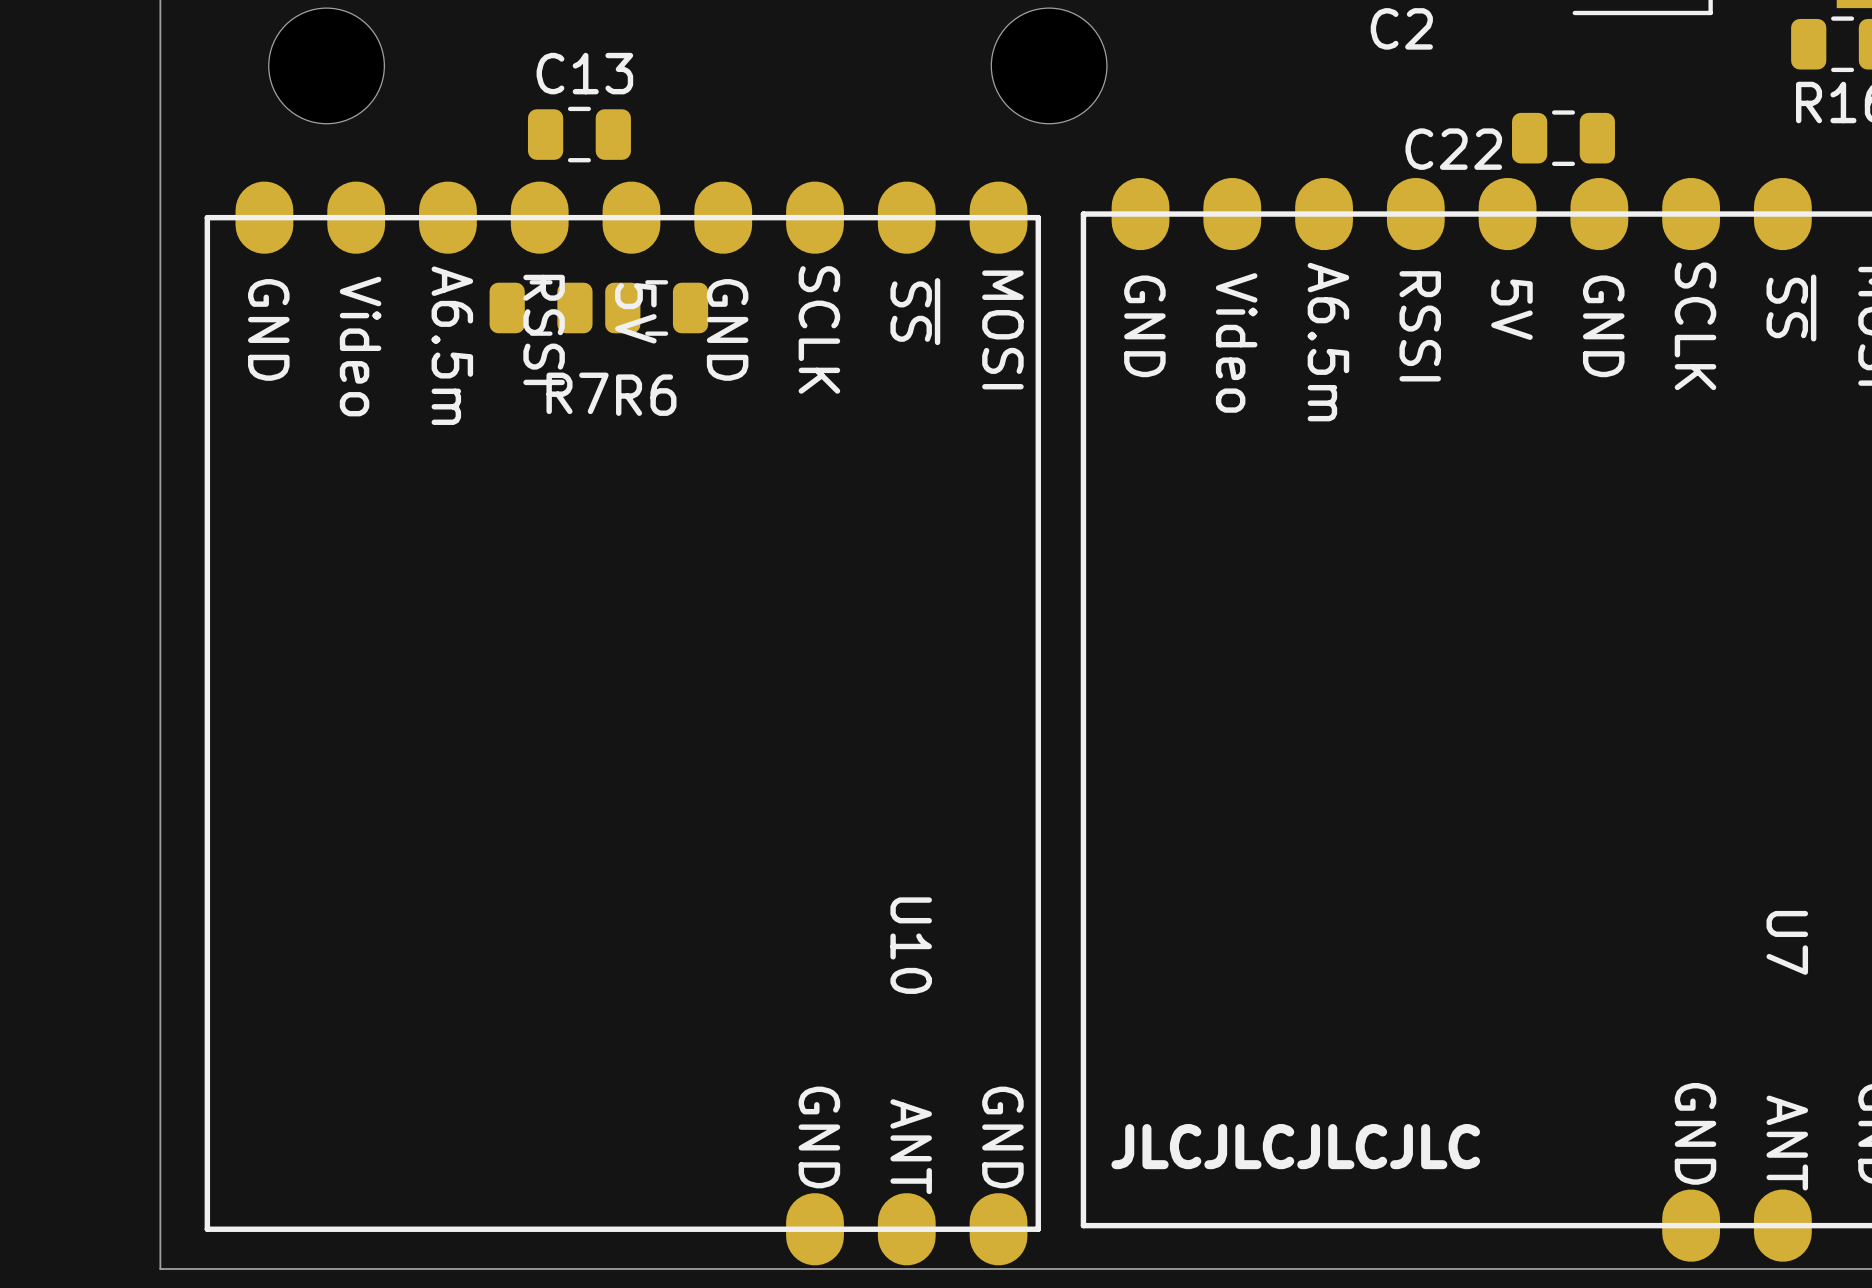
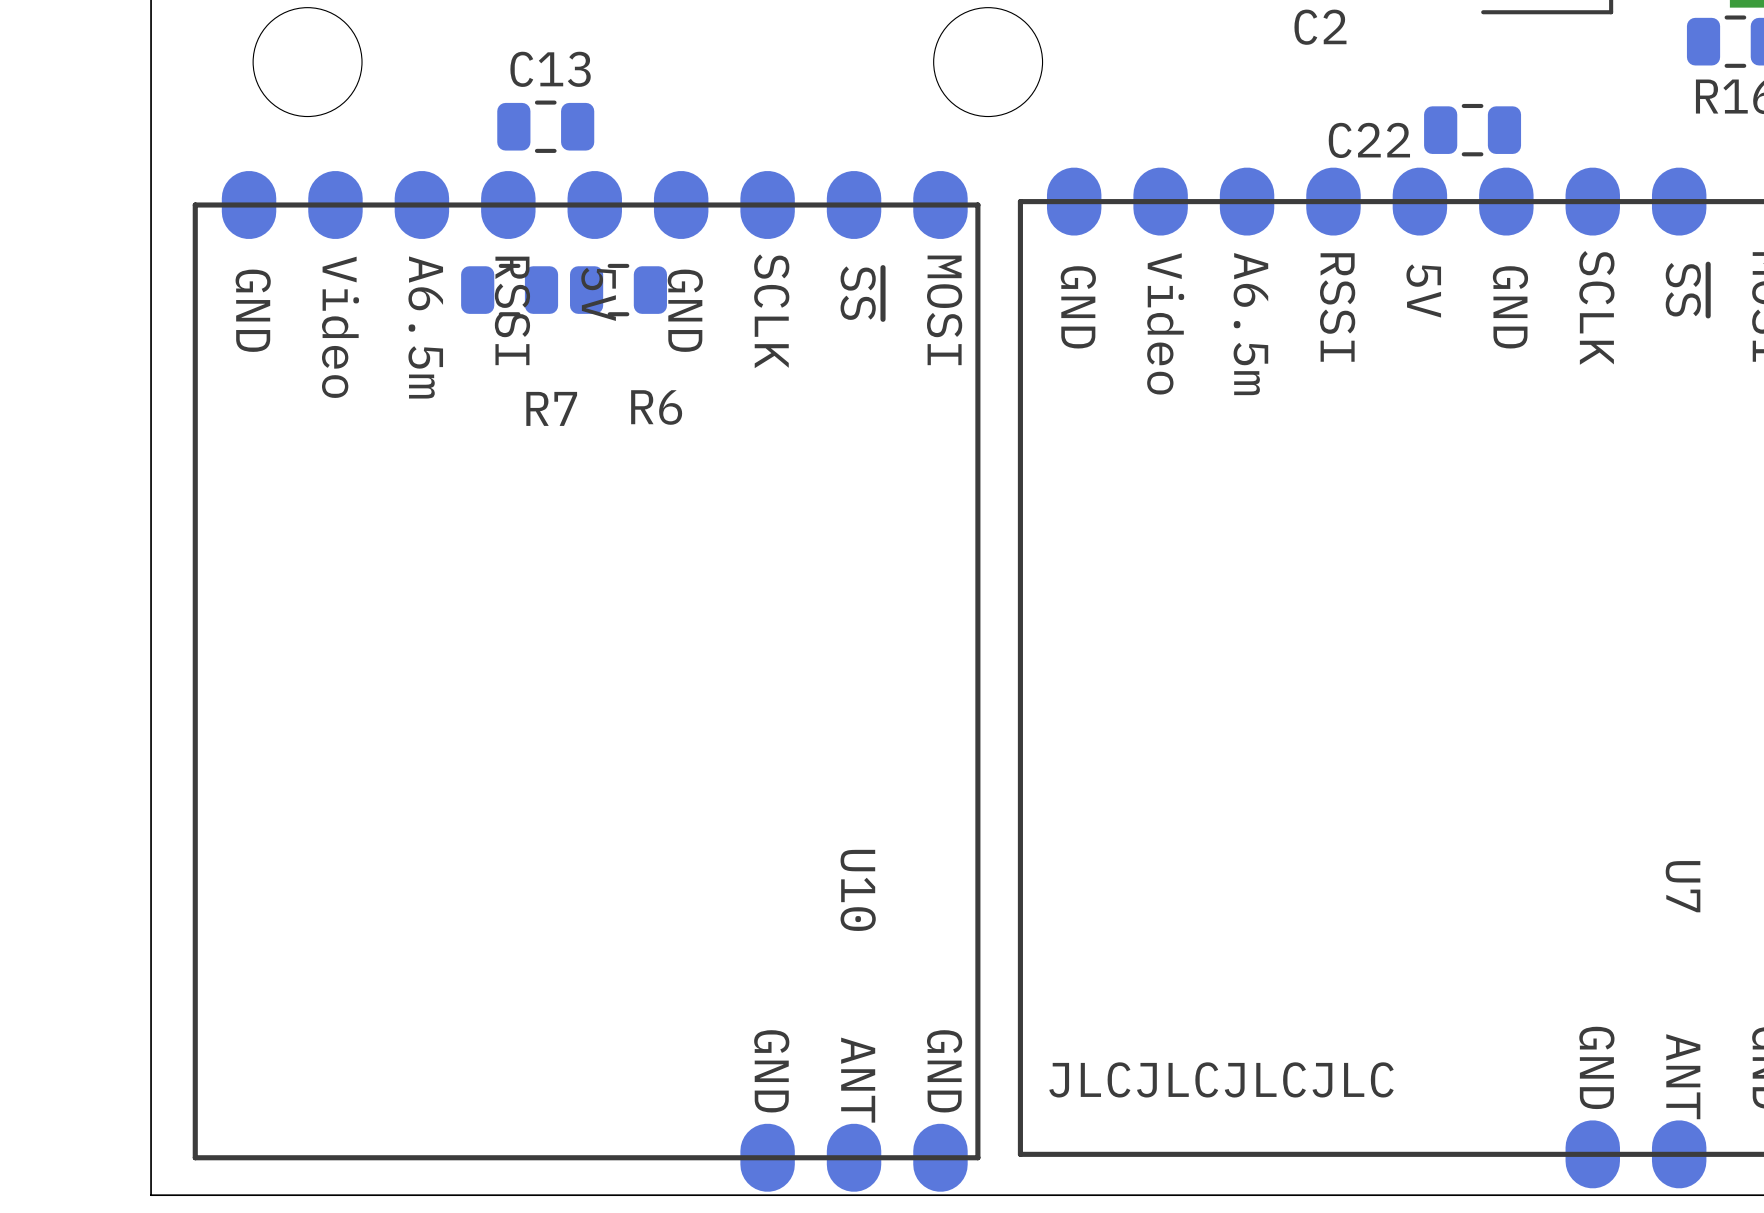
R7 name position: R7 (577, 393) -> R7 (551, 408)
R6 name position: R6 (646, 395) -> R6 (656, 407)

